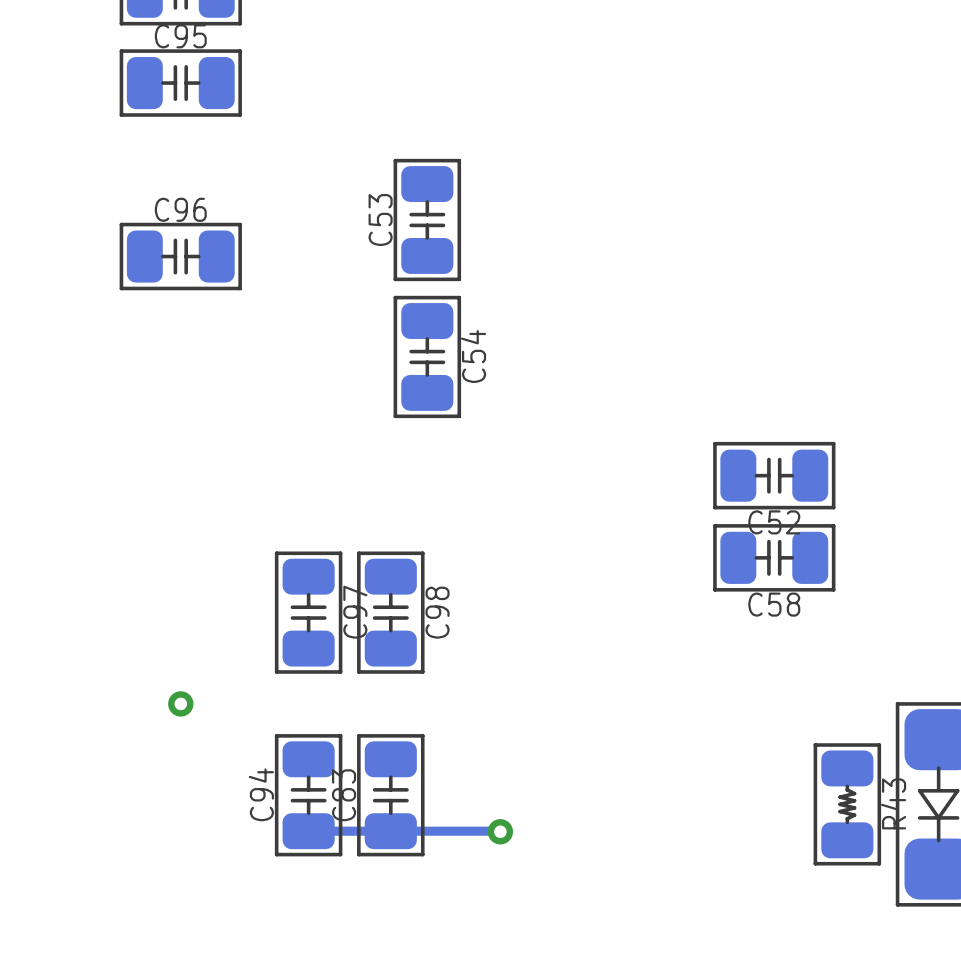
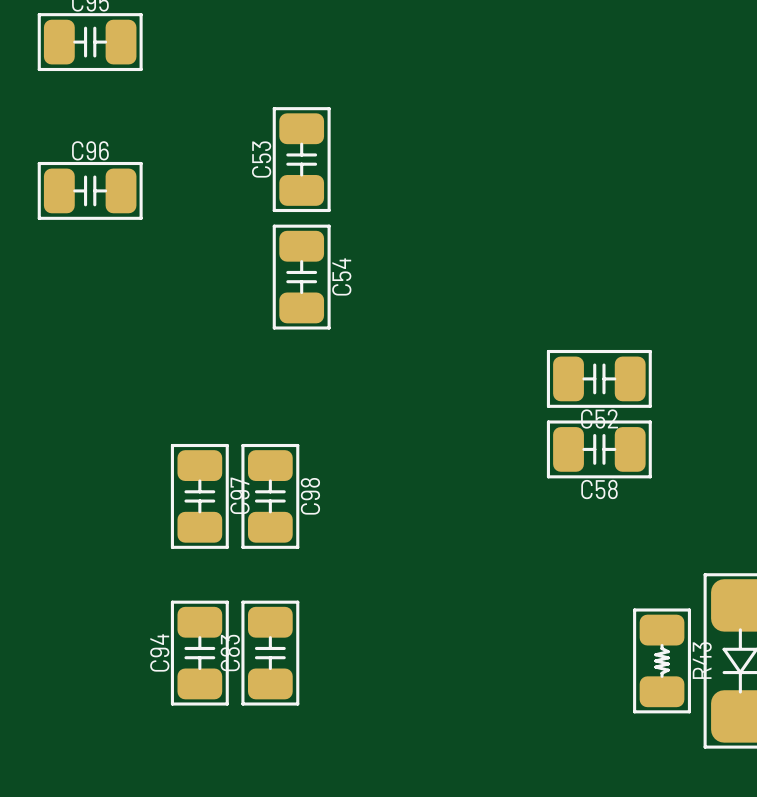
via: (180, 703) -> none
track: (308, 831) (500, 831) -> none
via: (500, 831) -> none

